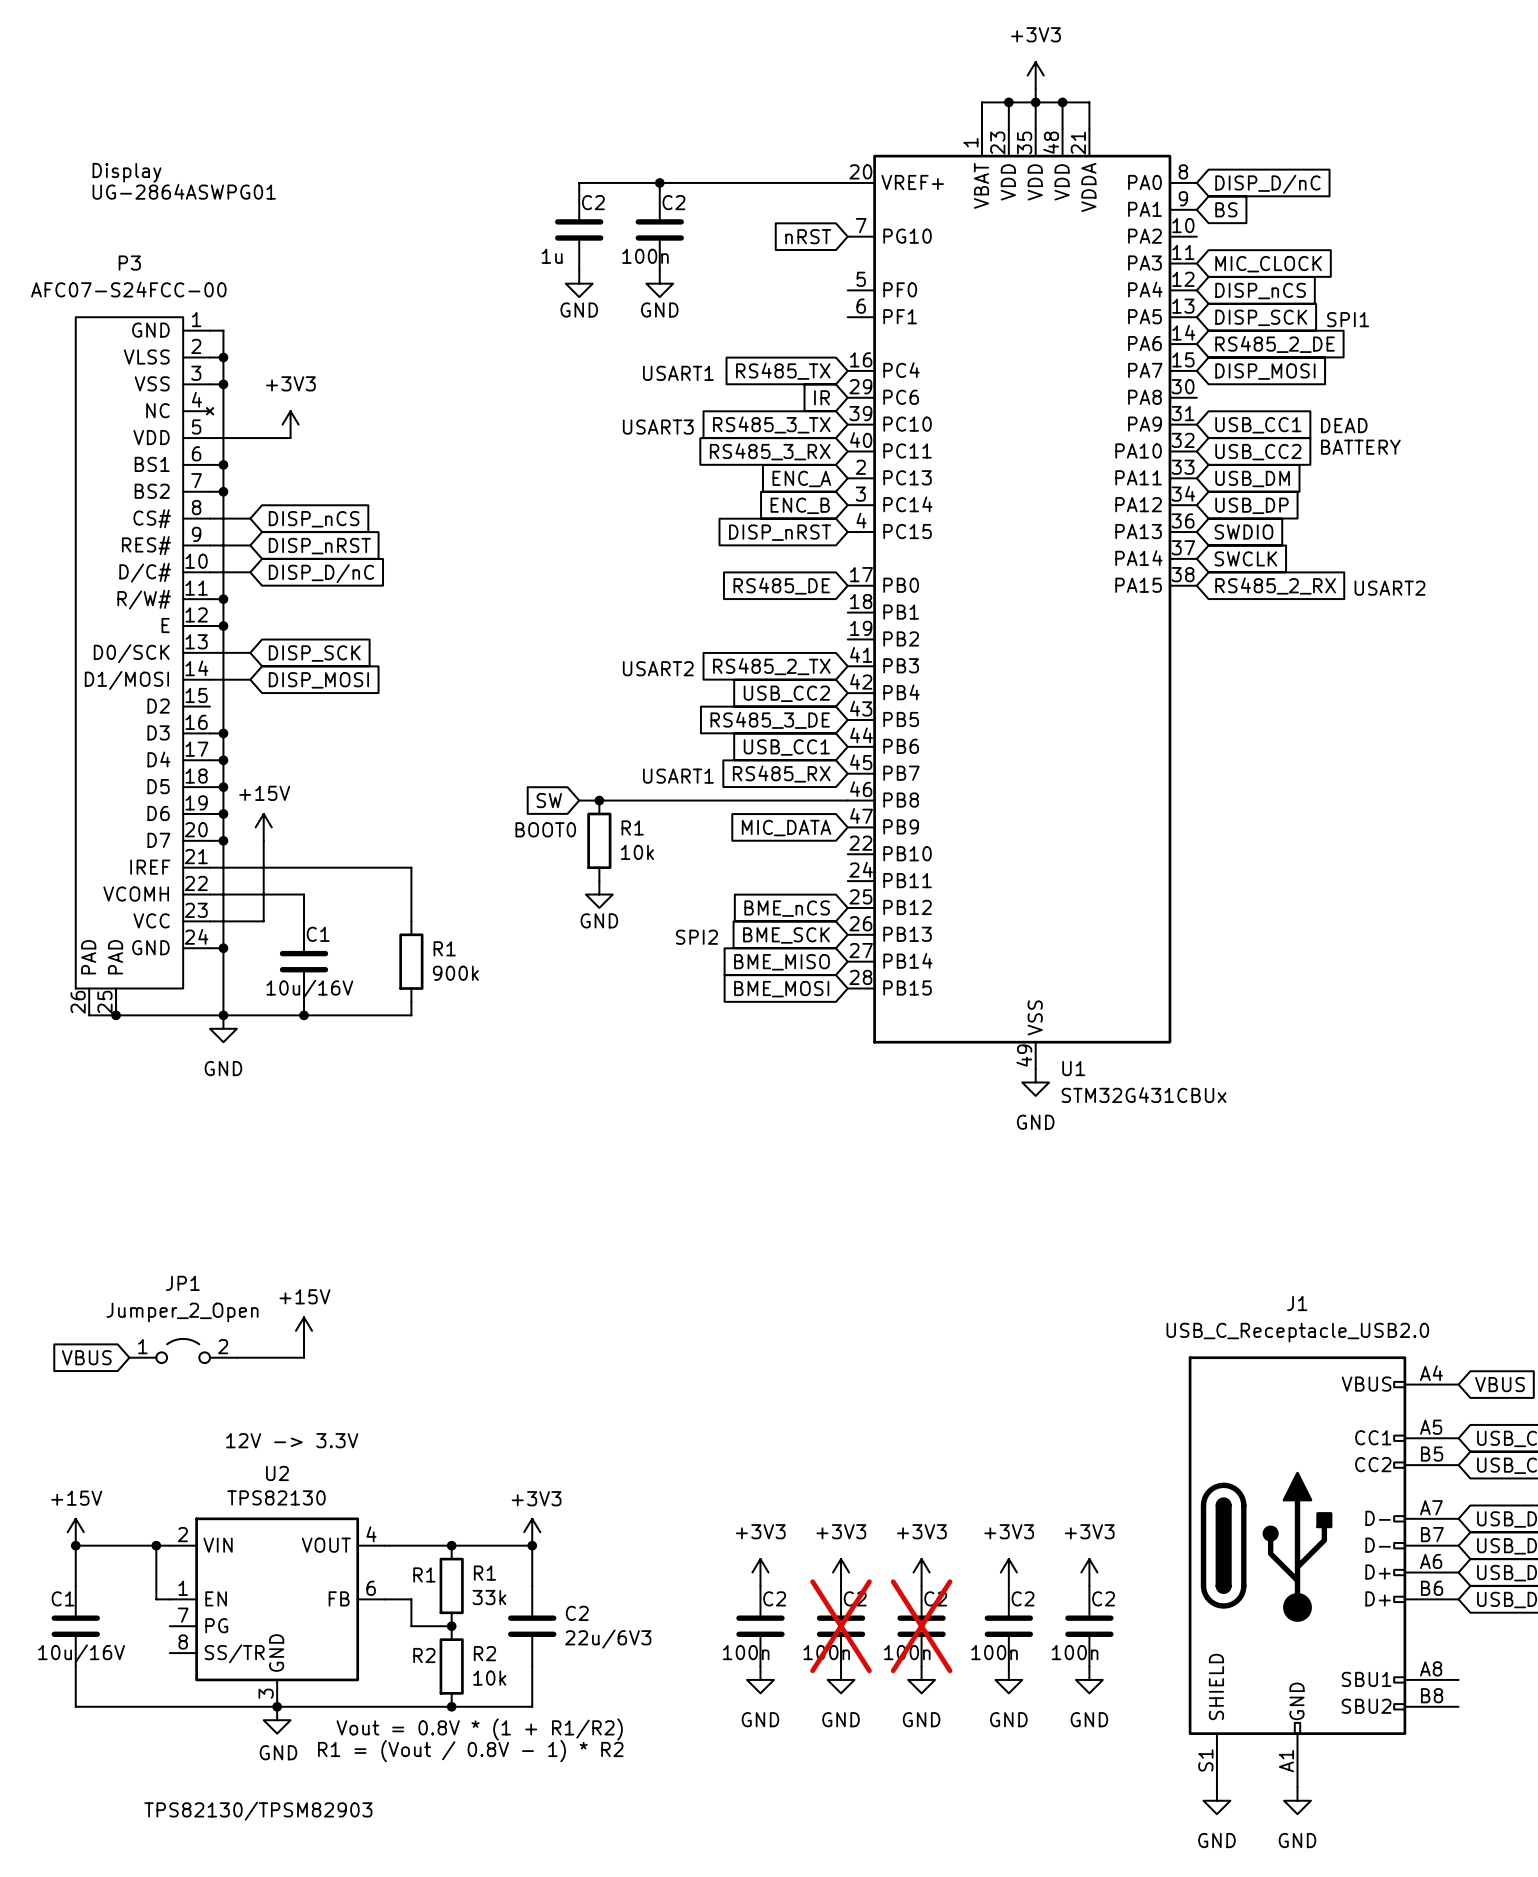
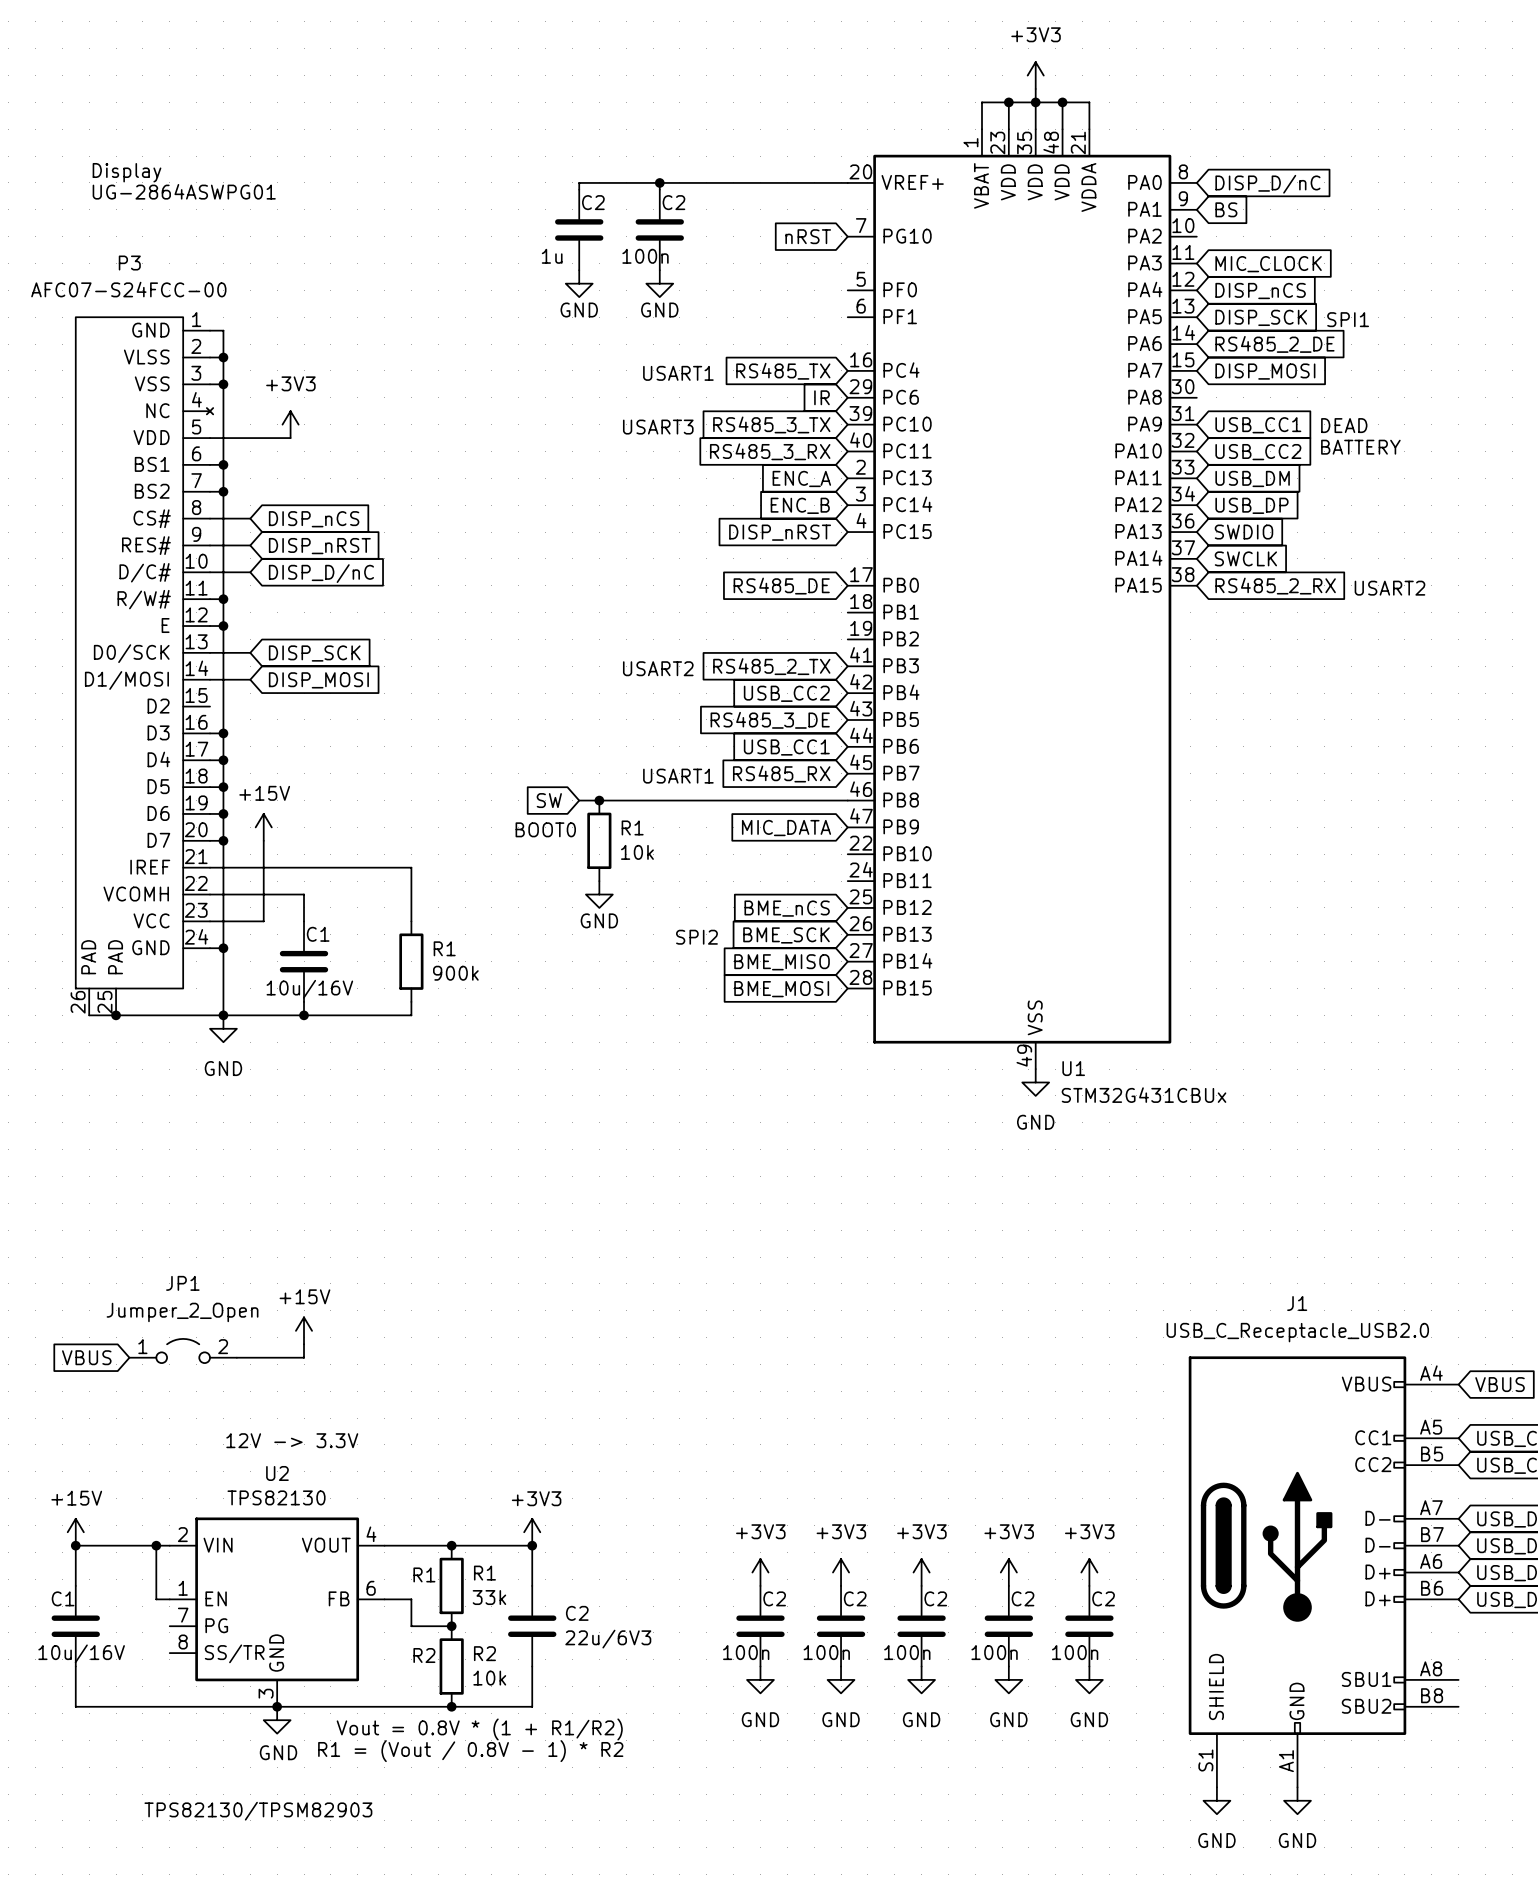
C2 do-not-place cross: (841, 1626) -> none
C2 do-not-place cross: (921, 1626) -> none

